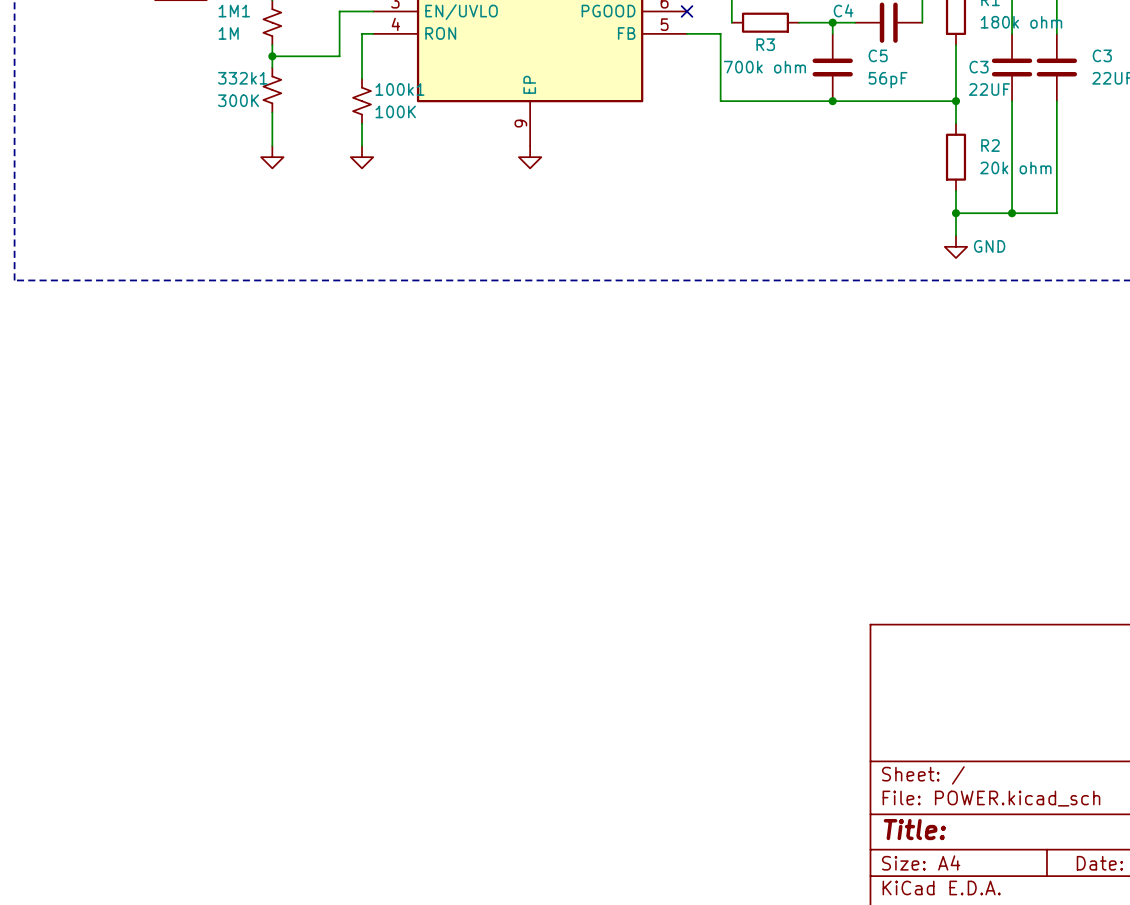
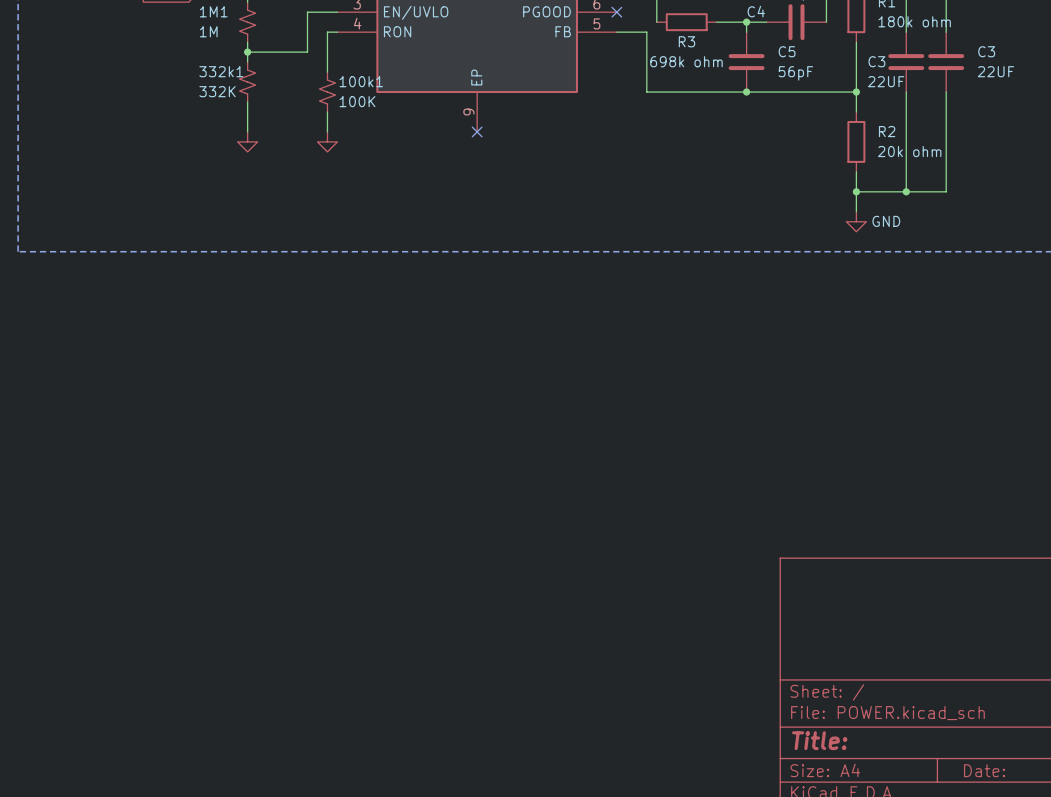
R3 value: 700k ohm (764, 67) -> 698k ohm (686, 61)
332k1 value: 300K (238, 100) -> 332K (217, 91)
no-connect mark: none -> (477, 131)
power symbol: (530, 157) -> none

